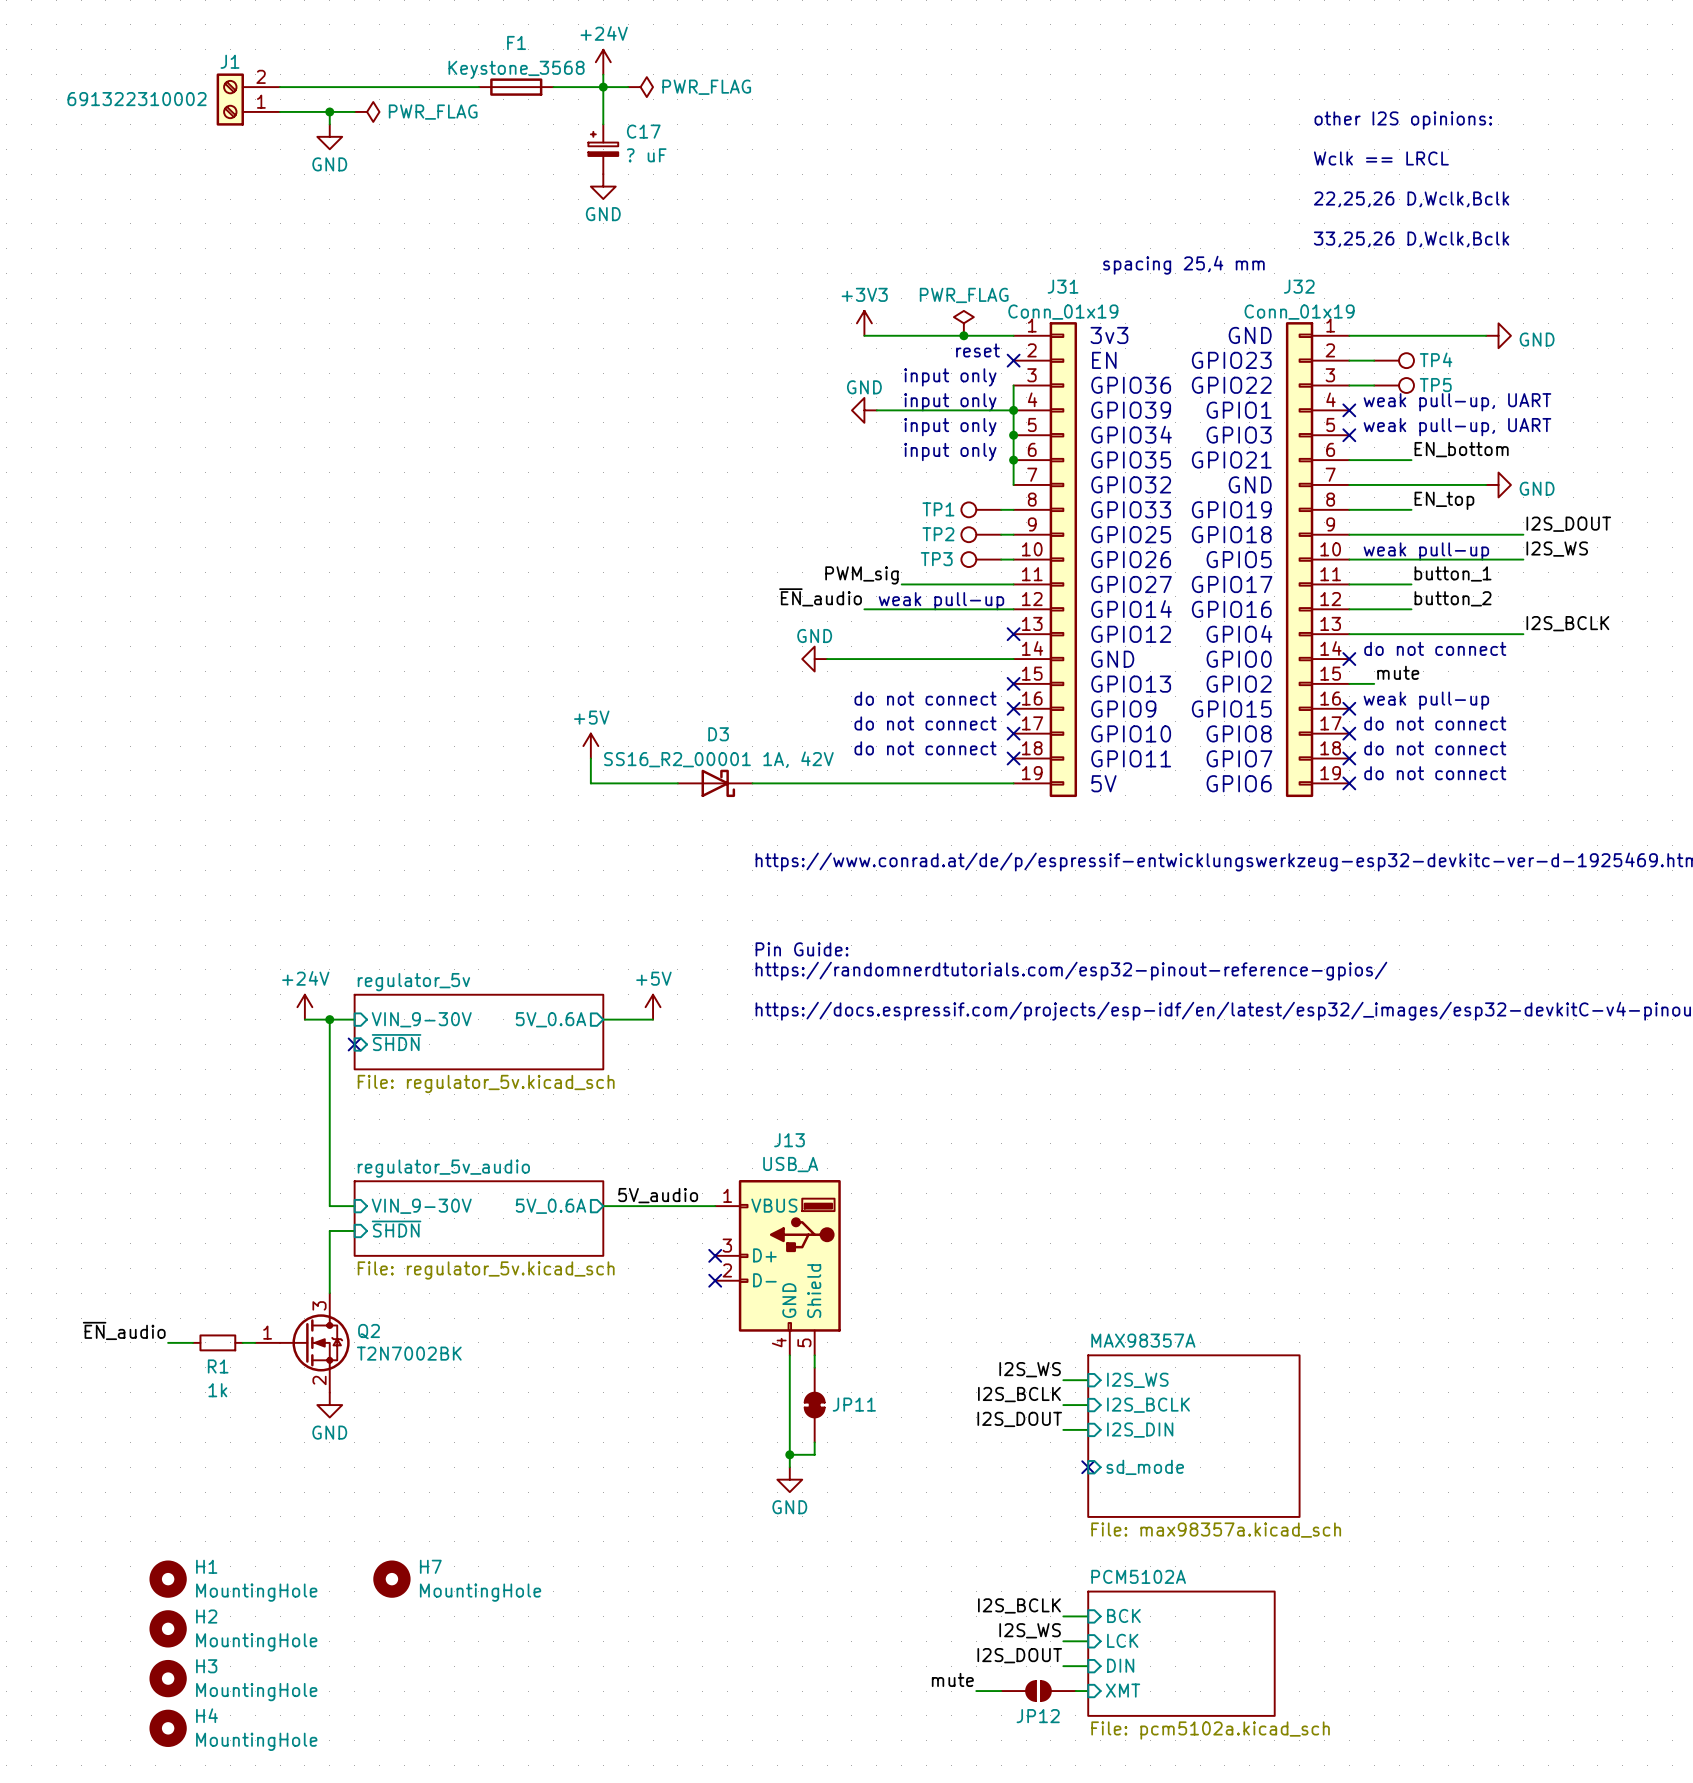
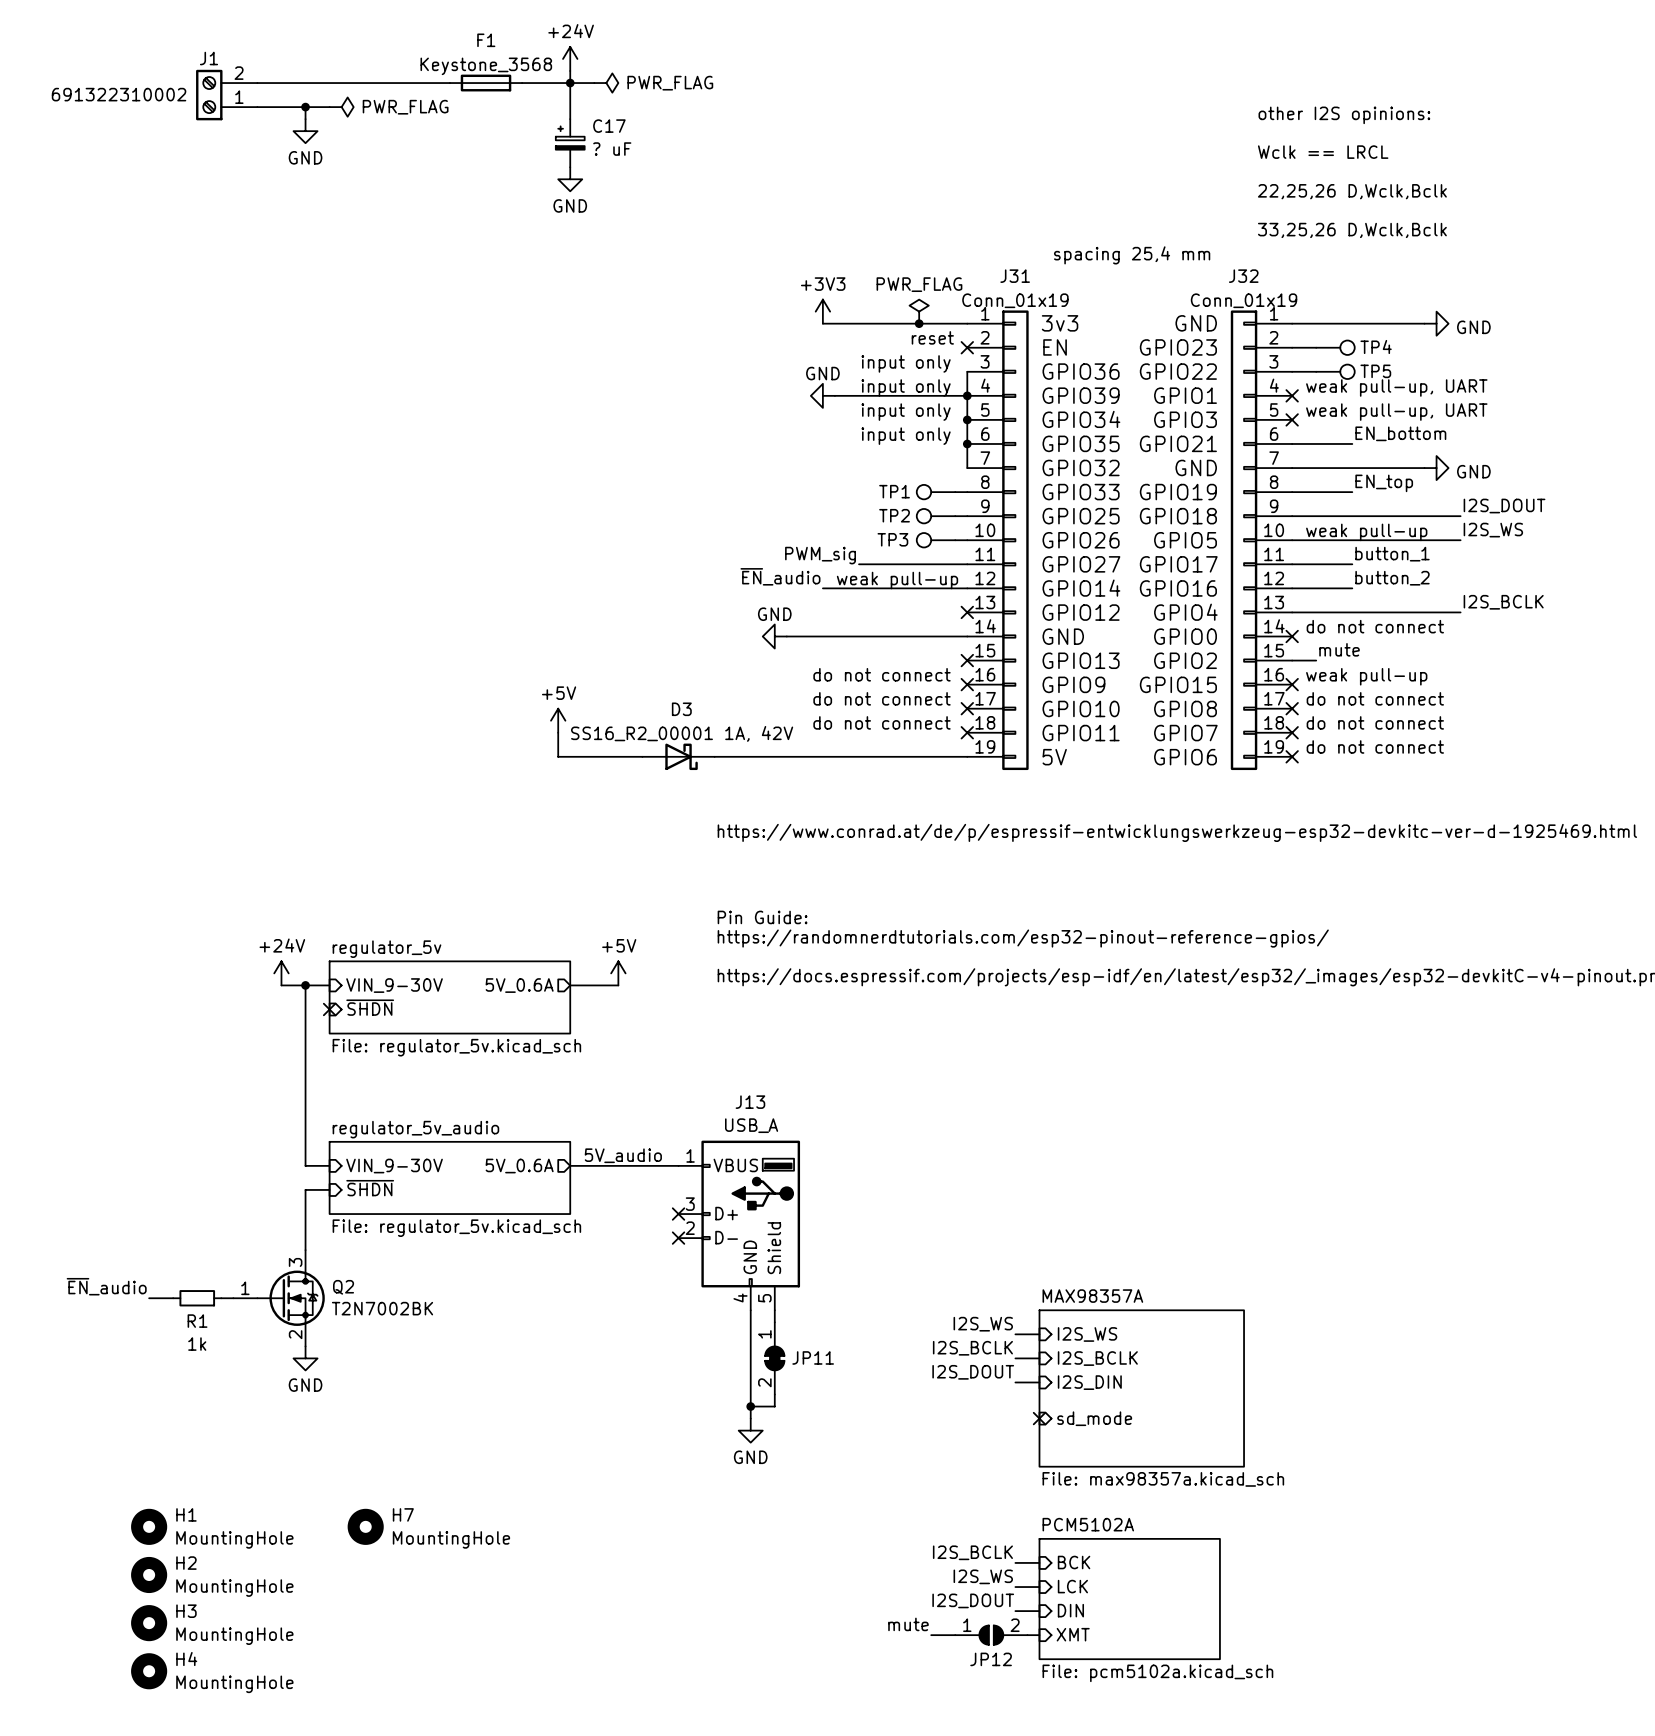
JP11 pin number: none -> 1 (764, 1334)
JP11 pin number: none -> 2 (764, 1382)
JP12 pin number: none -> 1 (967, 1625)
JP12 pin number: none -> 2 (1015, 1625)

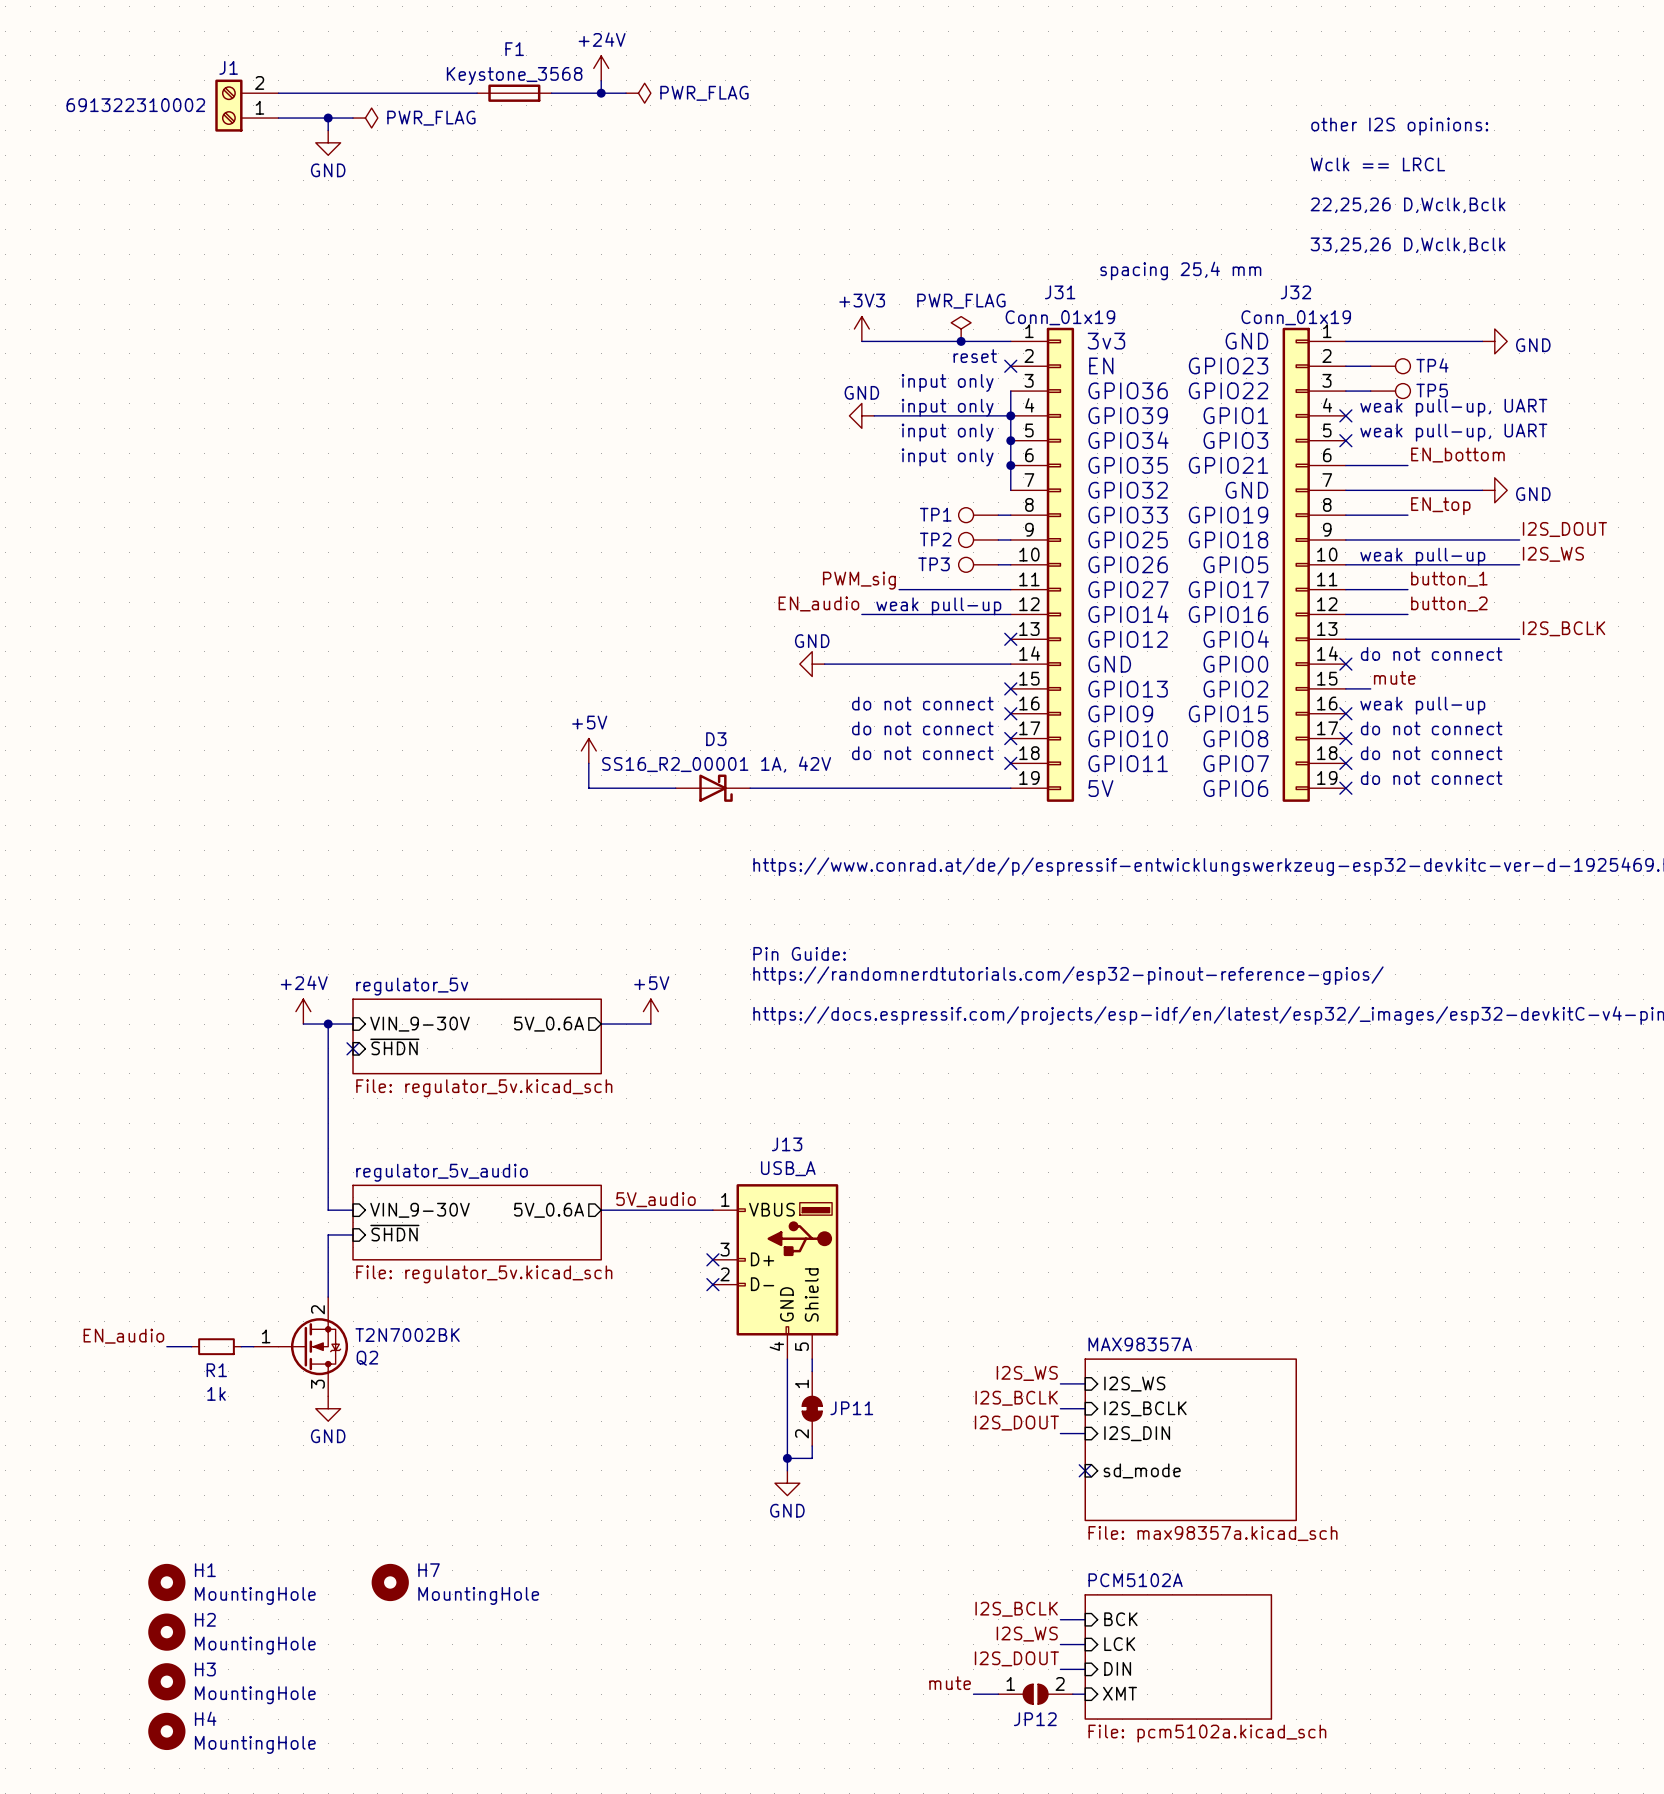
wire: (570, 83) (570, 119) -> none
C17: ? uF (570, 143) -> none
power symbol: GND (570, 179) -> none
label: ~{EN}_audio (780, 576) -> EN_audio (818, 603)
label: ~{EN}_audio (106, 1286) -> EN_audio (123, 1336)
Q2 flip: as is (291, 1298) -> up-down (313, 1346)

